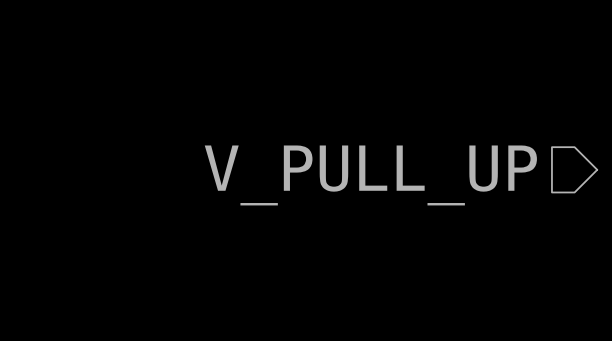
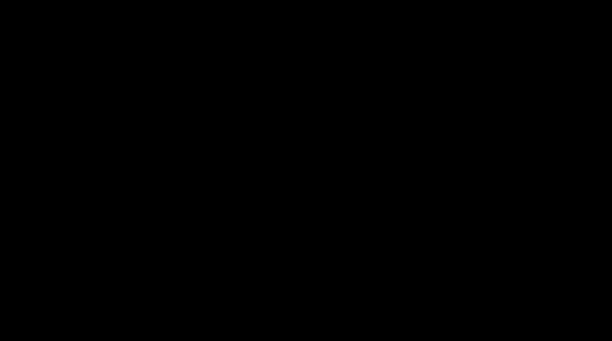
hierarchical label: V_PULL_UP (370, 175) -> none

